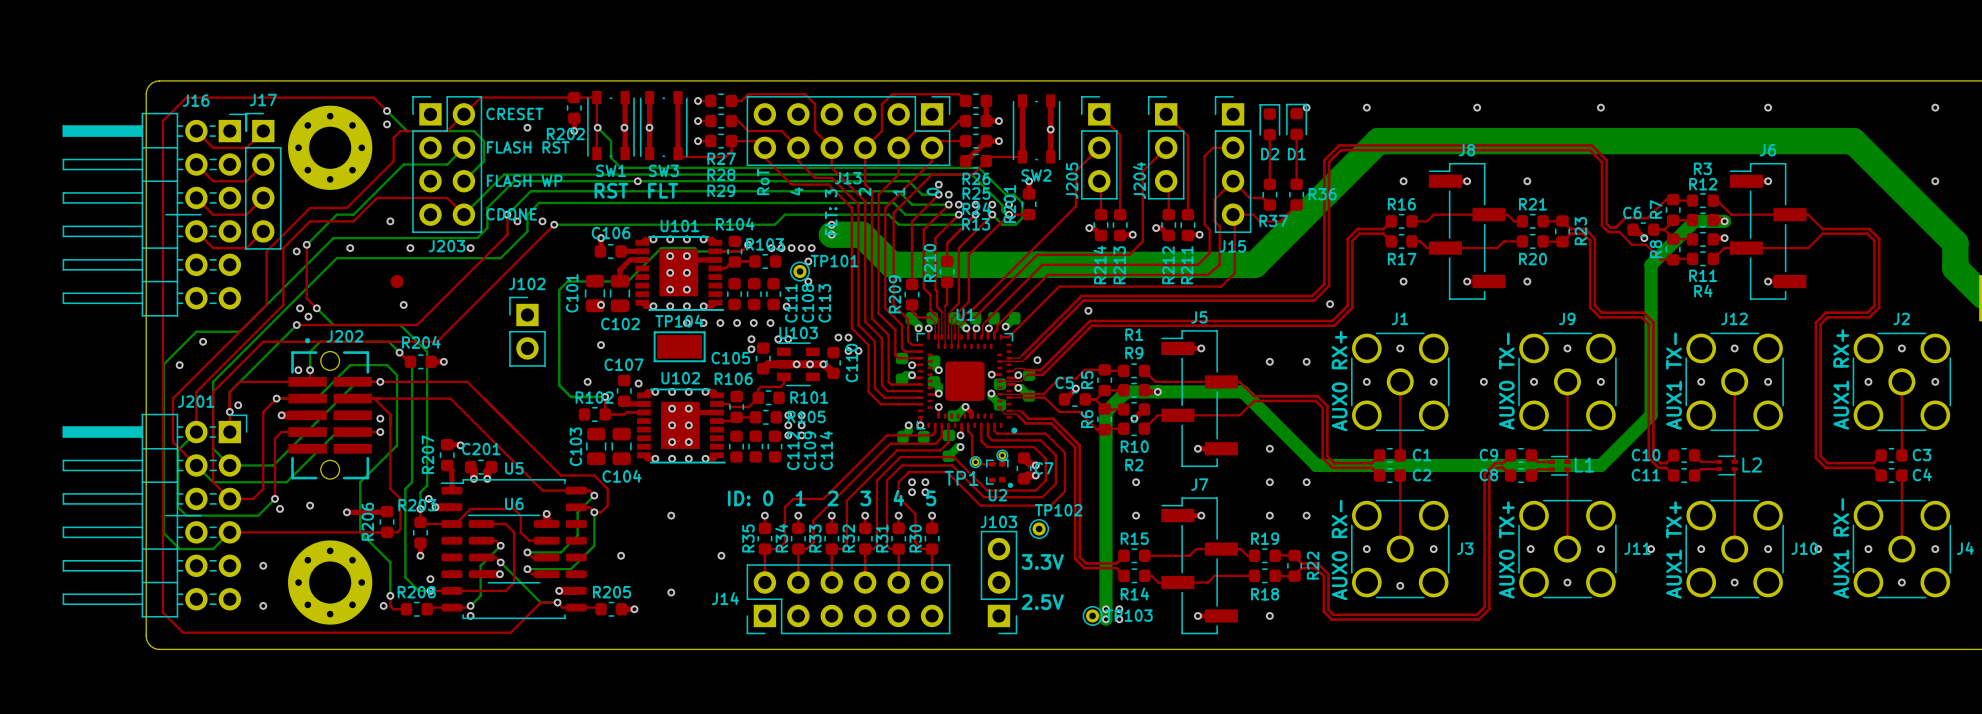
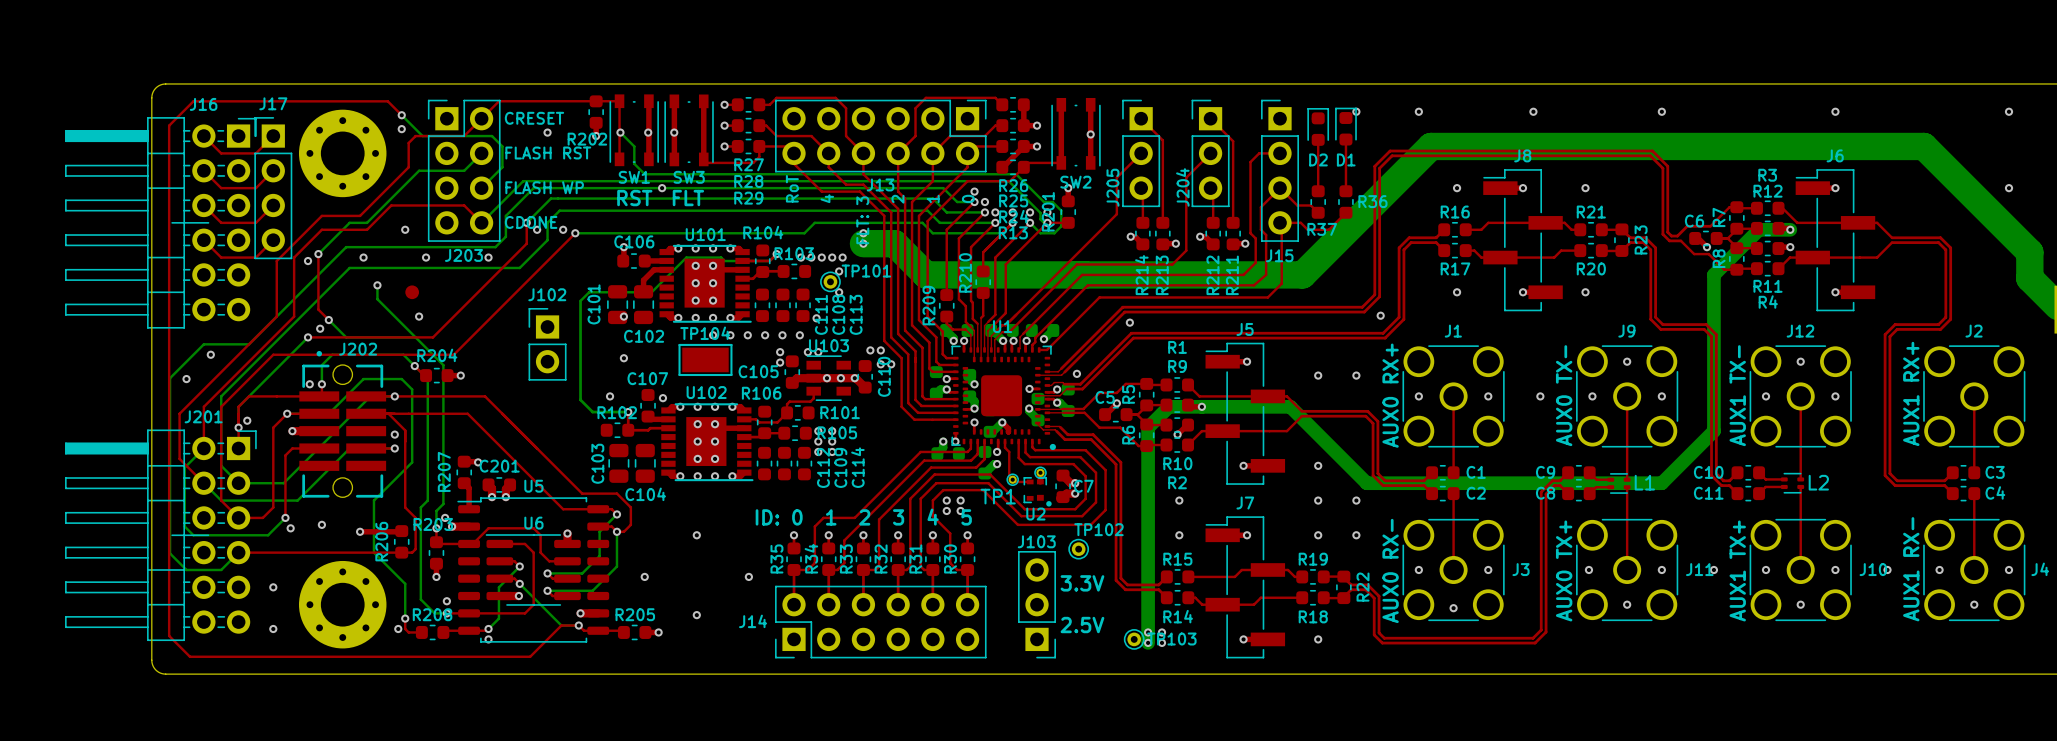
bottom track: none -> (377, 285) (377, 299) (415, 337)
via position: (300, 308) -> (377, 285)
via: (1400, 348) -> none
via: (1901, 348) -> none
via: (1868, 381) -> none
via: (1935, 381) -> none

